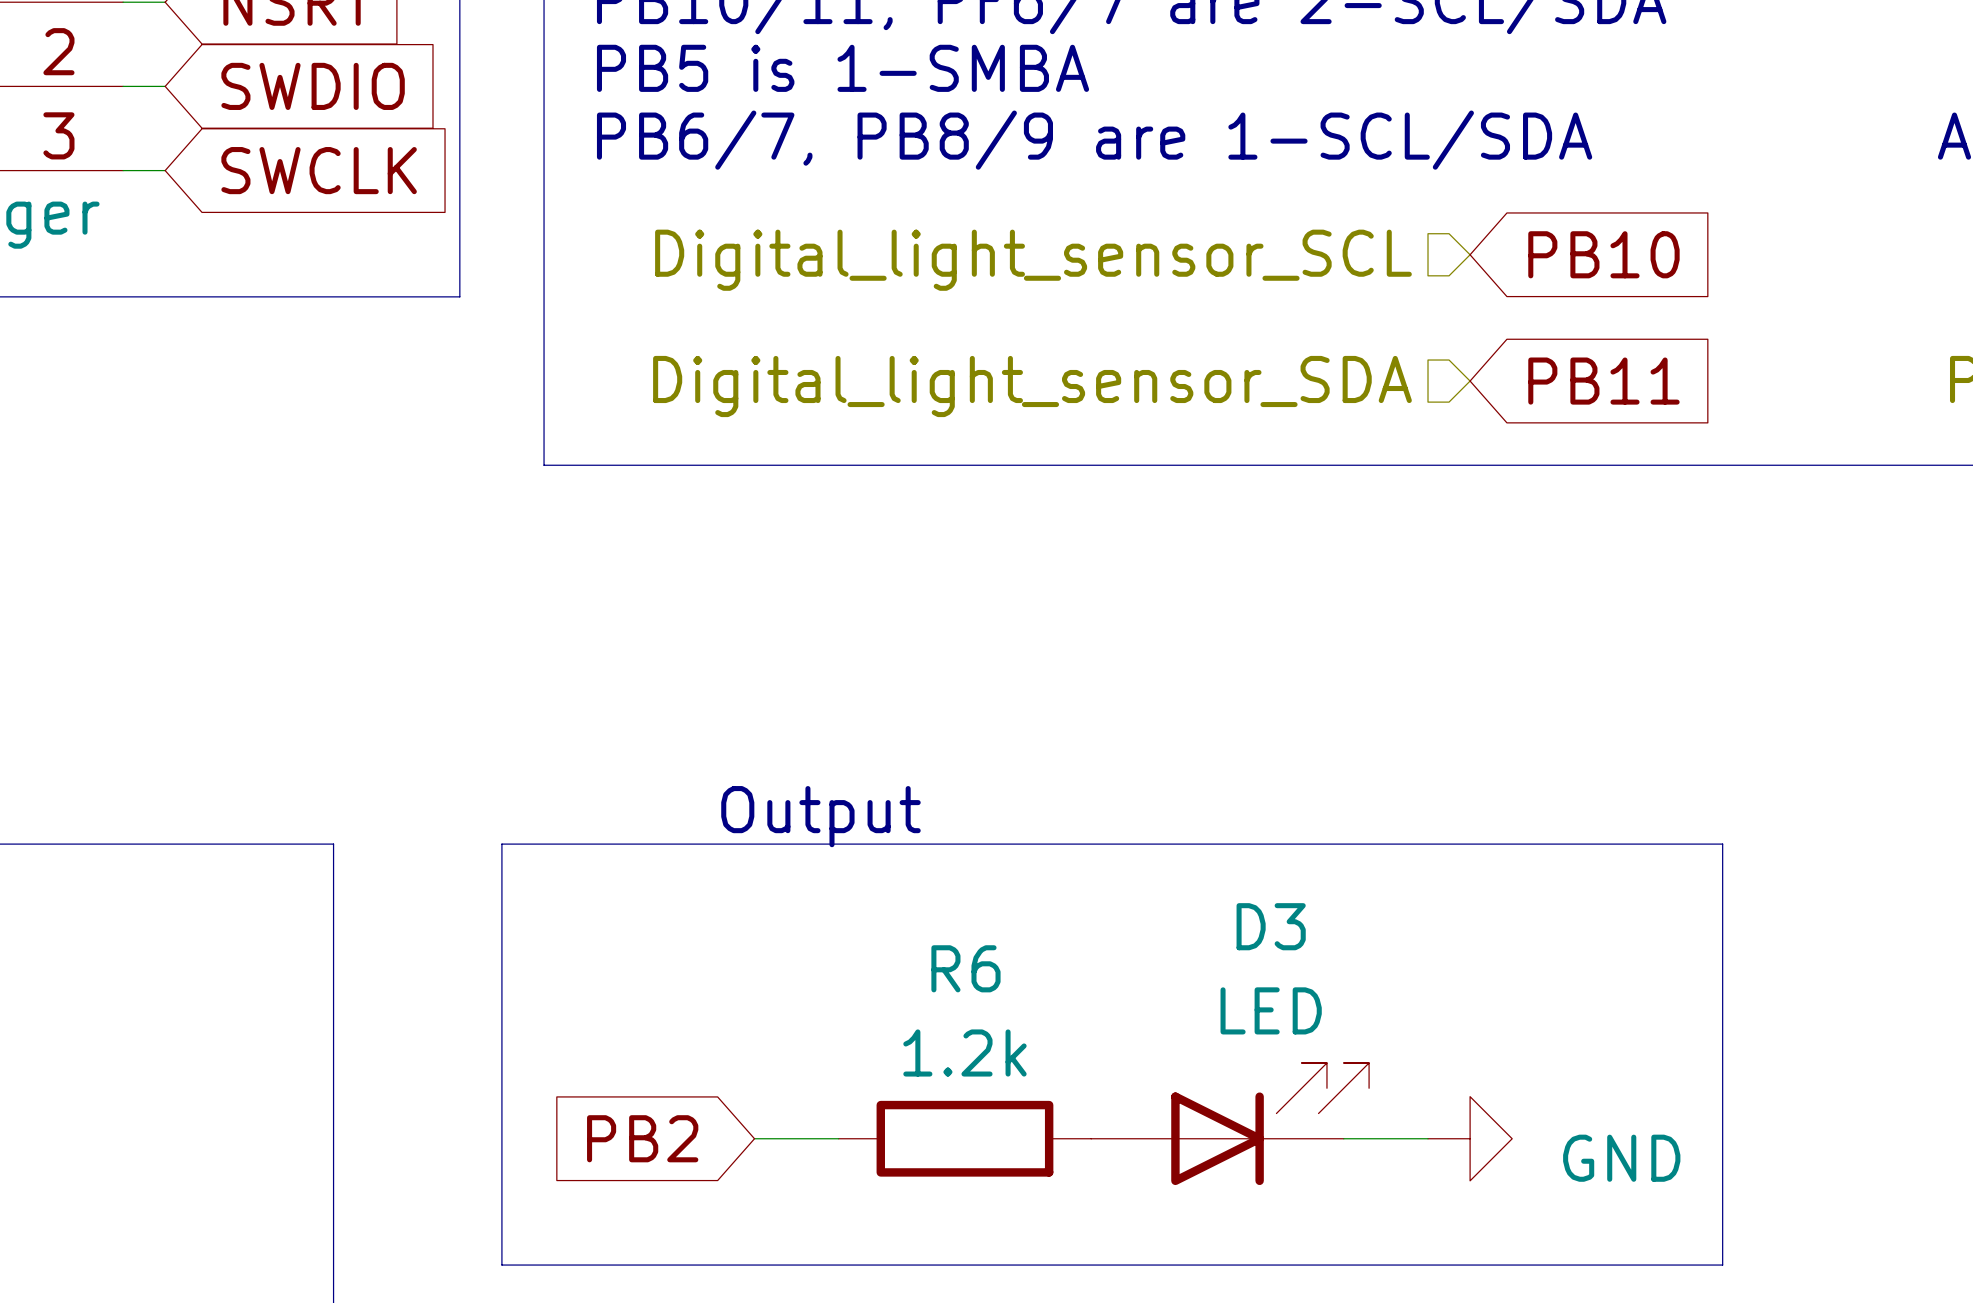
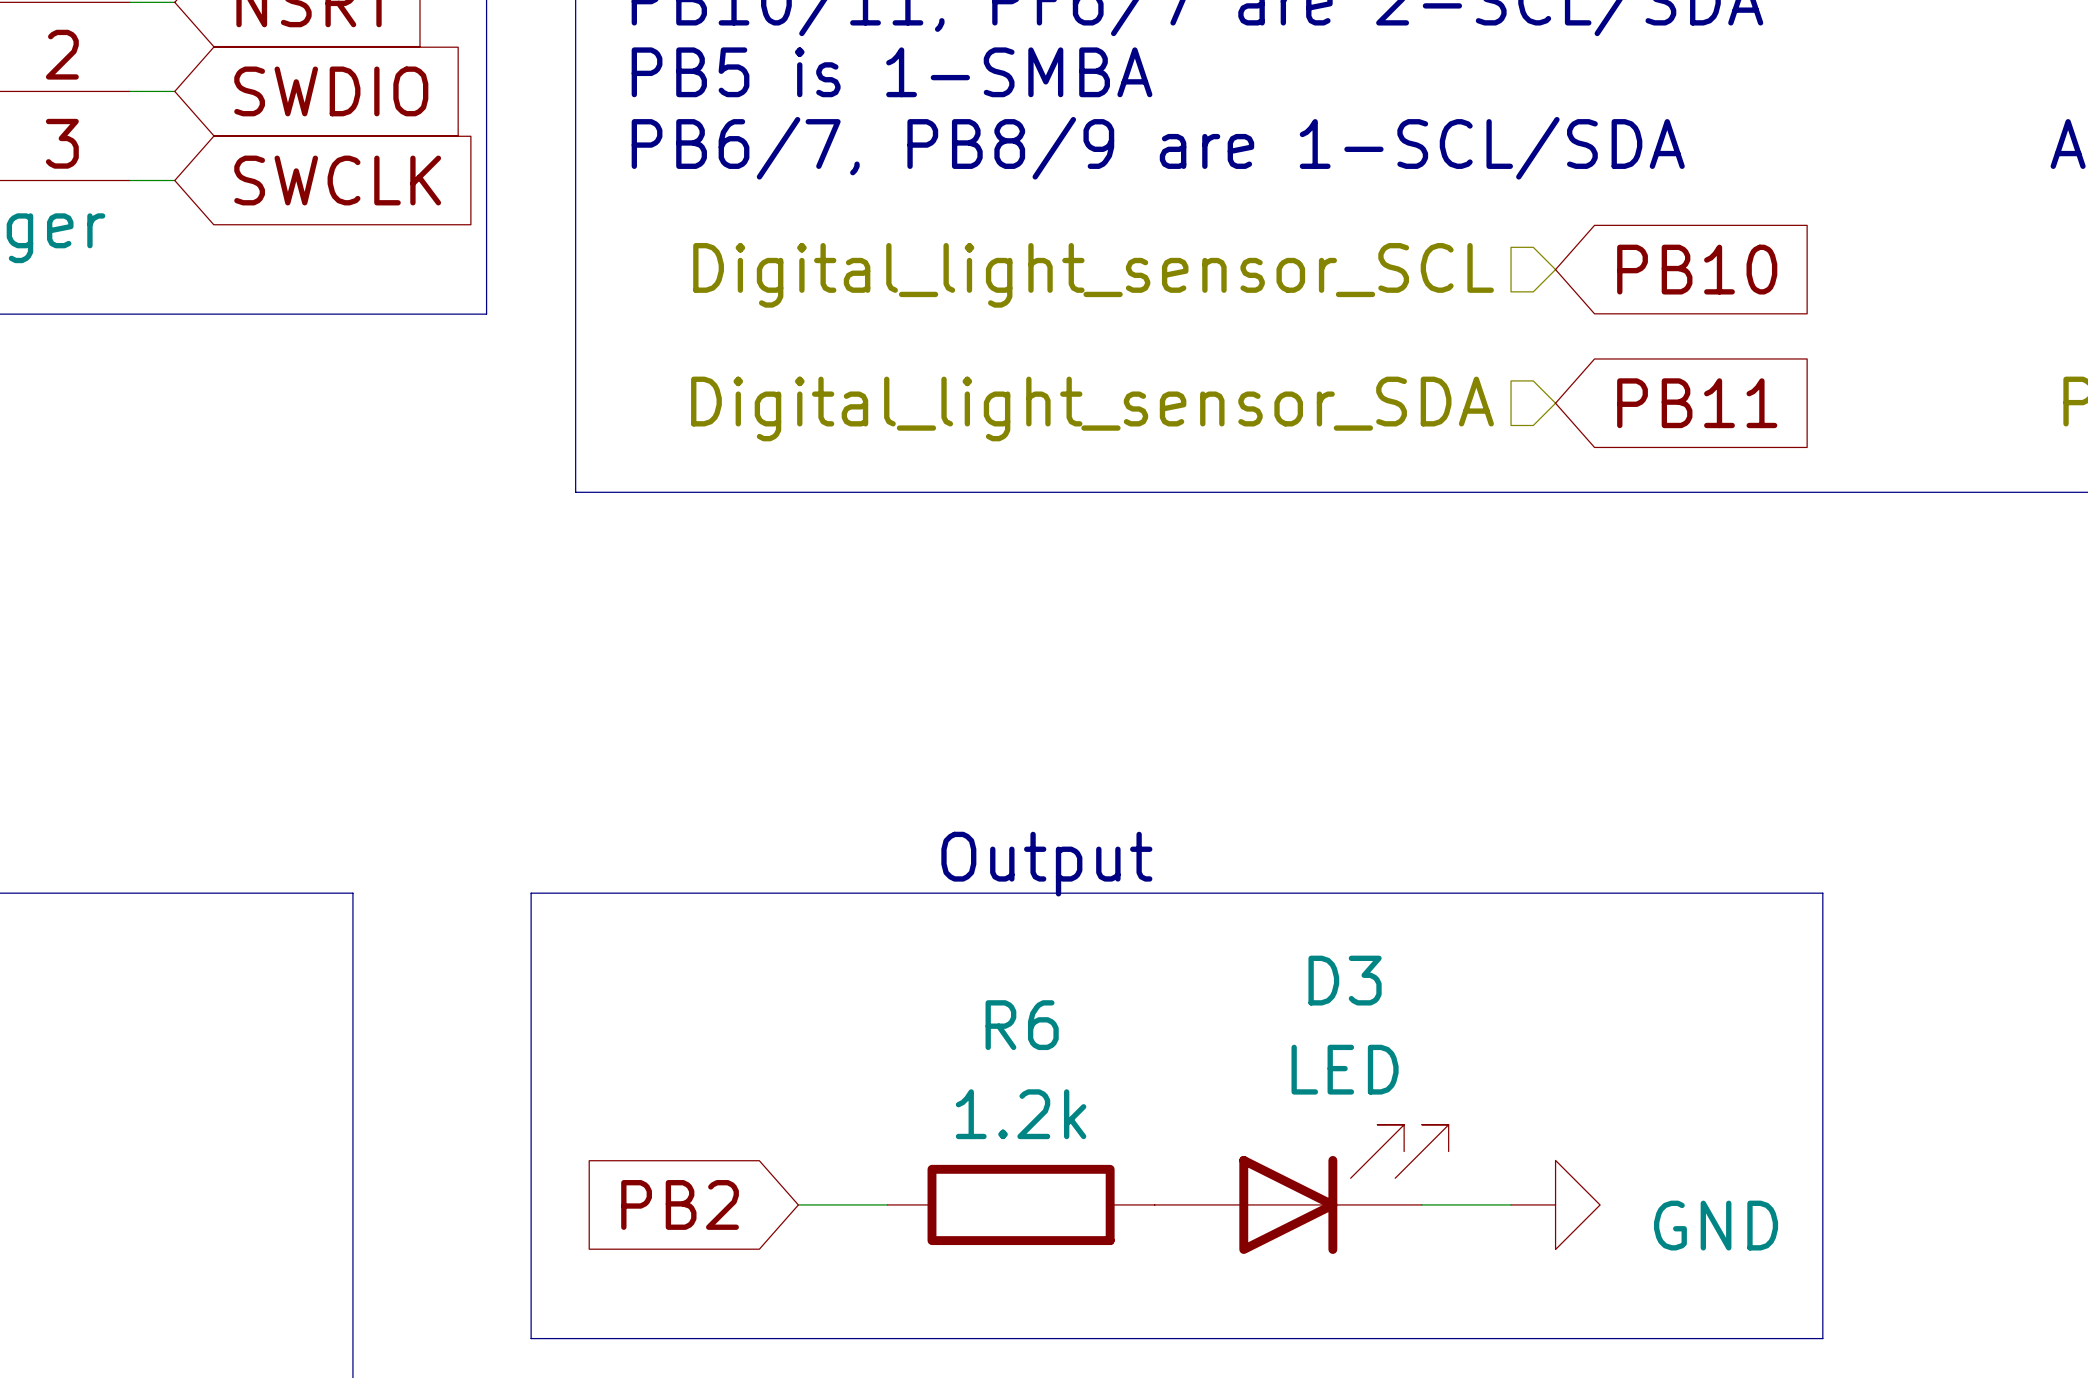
text position: Output (820, 816) -> Output (1046, 864)

